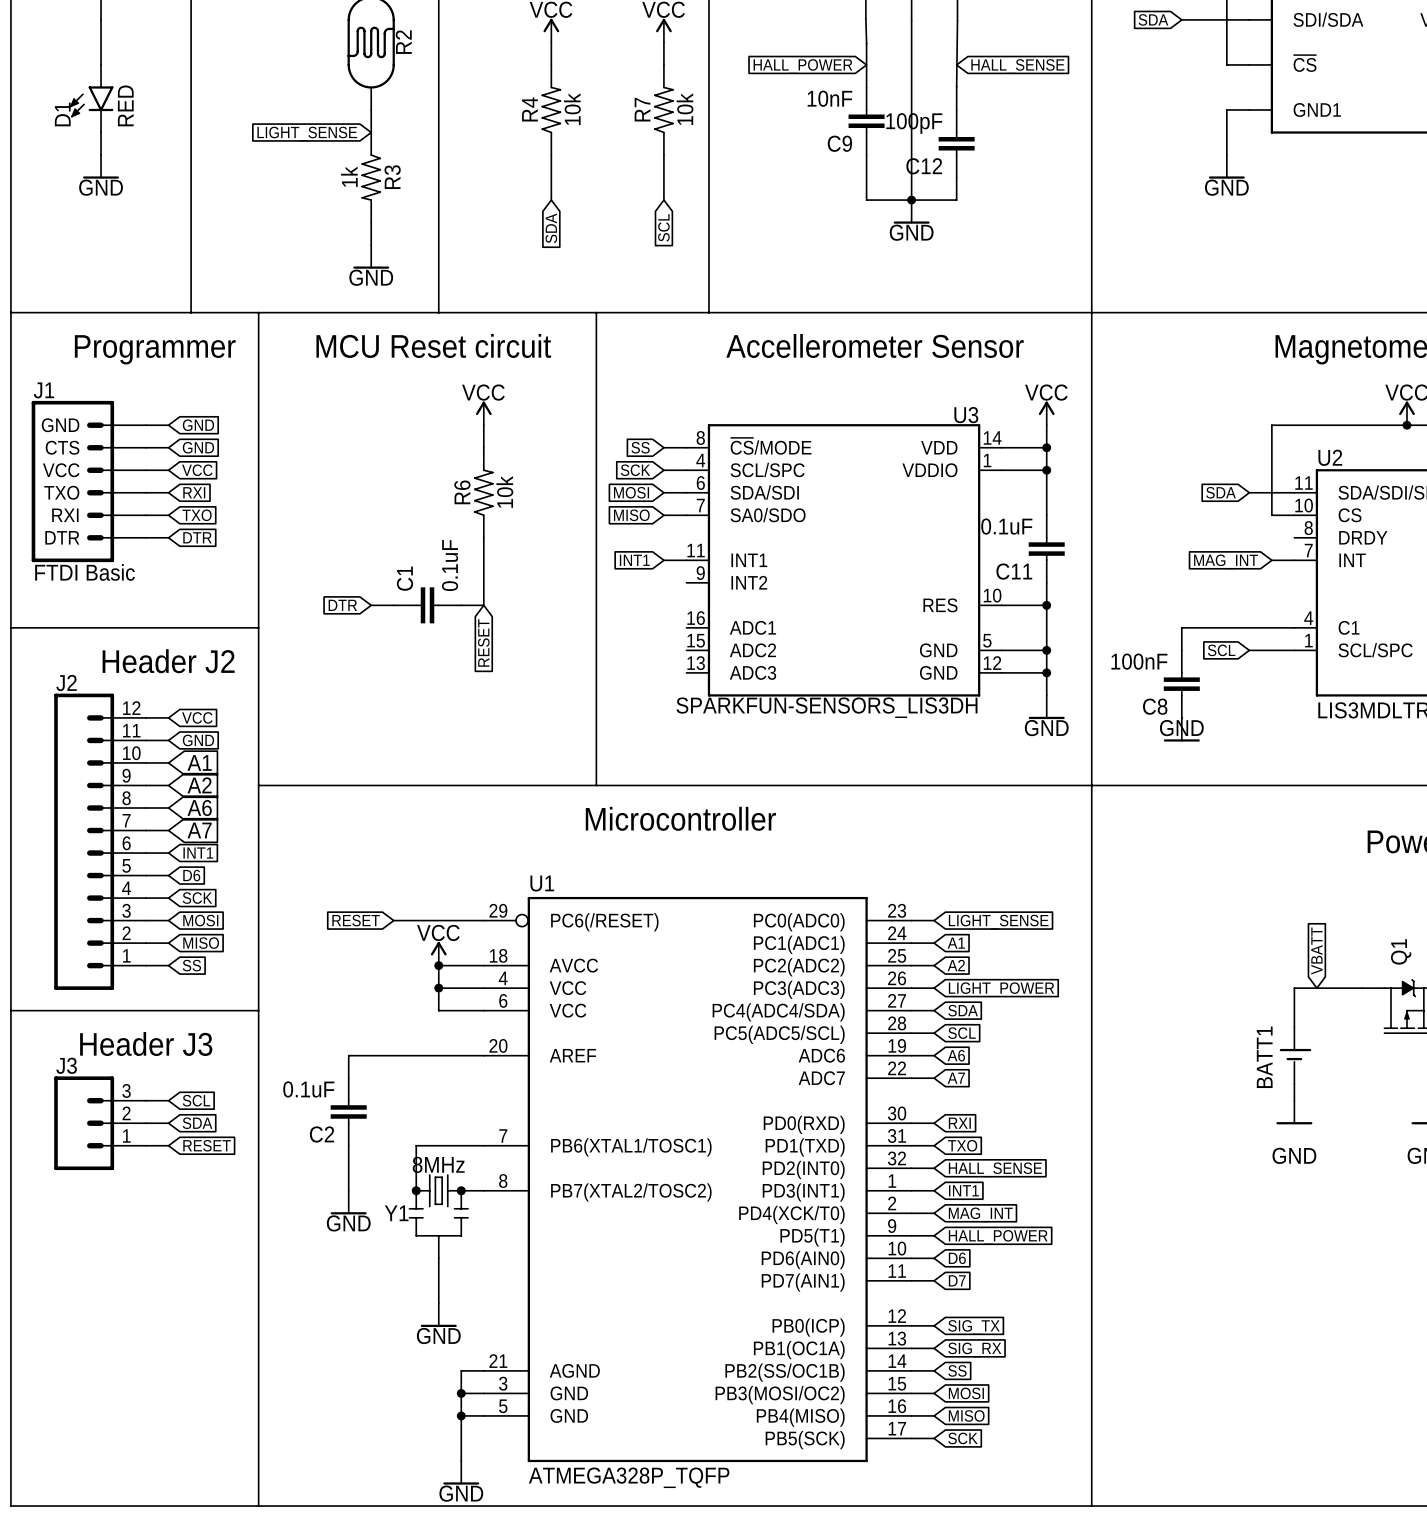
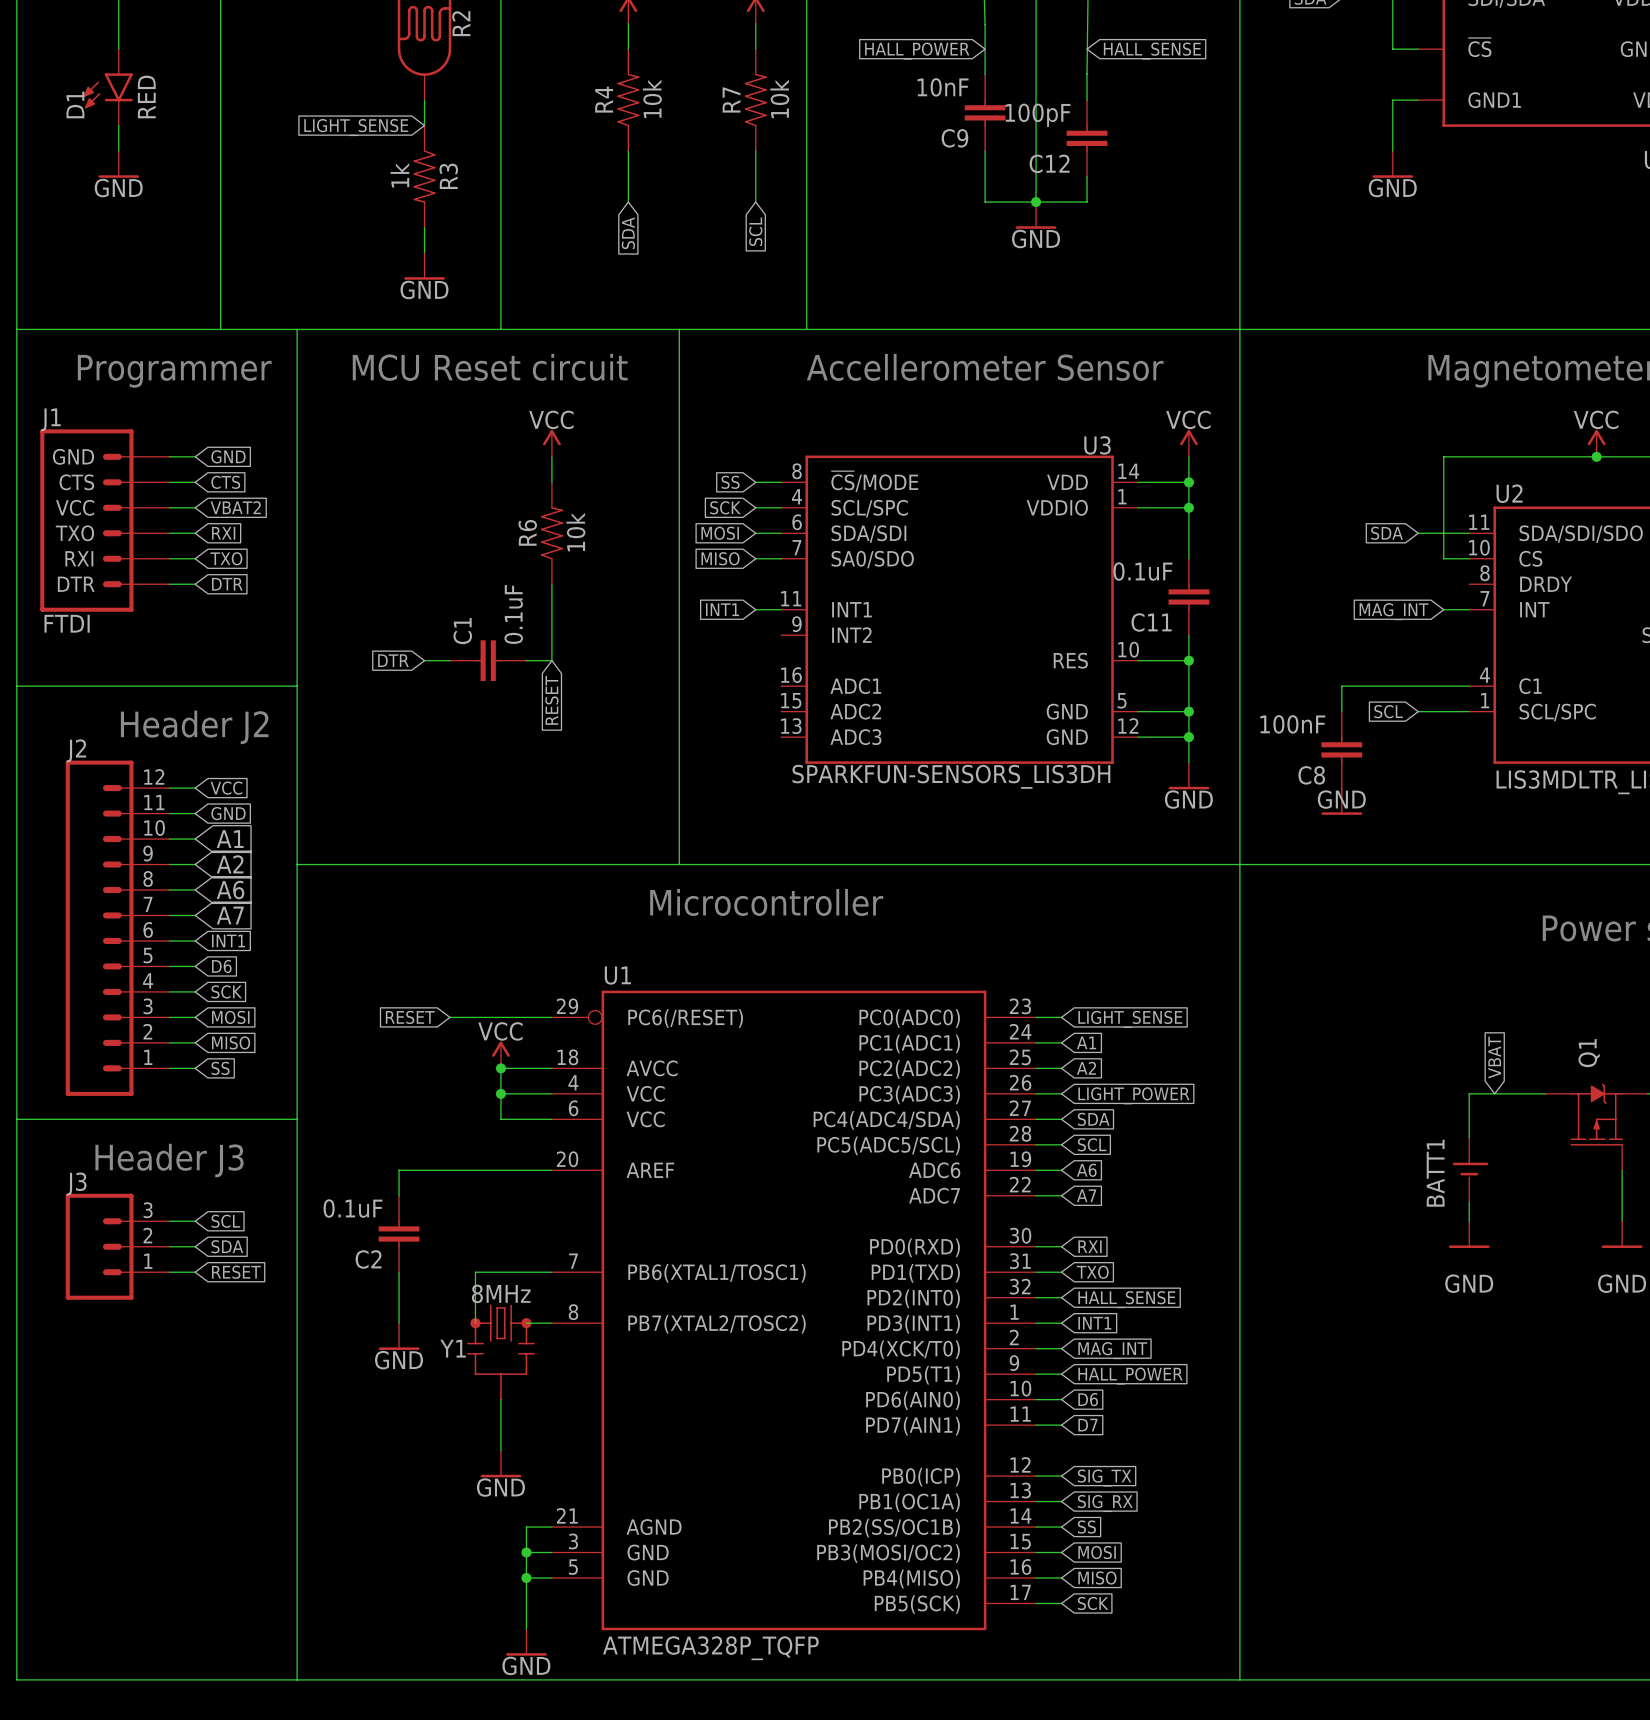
global label: GND (198, 447) -> CTS (225, 482)
global label: VCC (197, 470) -> VBAT2 (235, 507)
J1 value: FTDI Basic (85, 572) -> FTDI (67, 623)
global label: VBATT (1316, 951) -> VBAT (1494, 1057)

